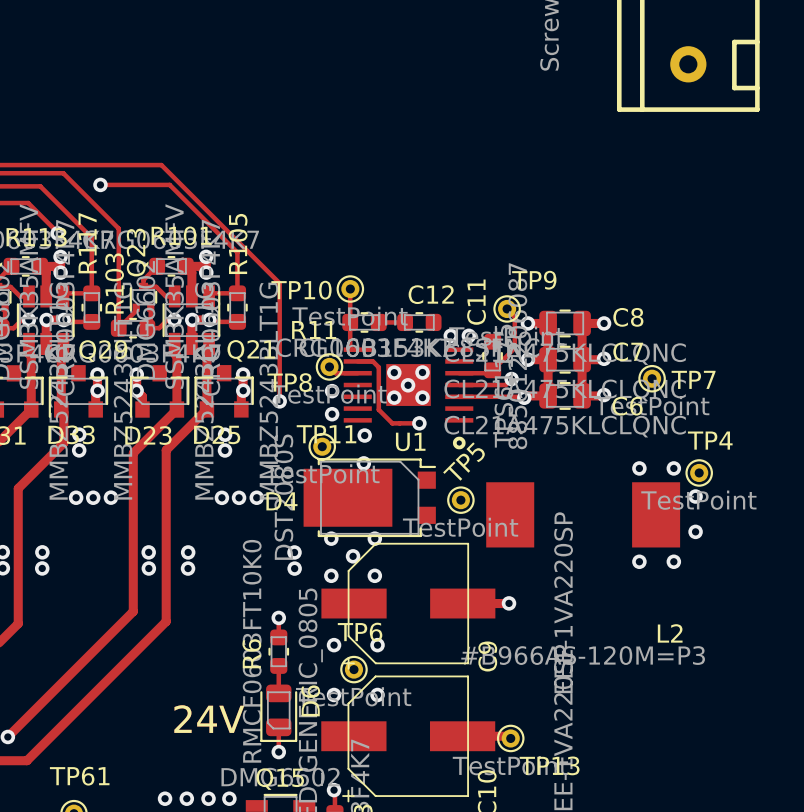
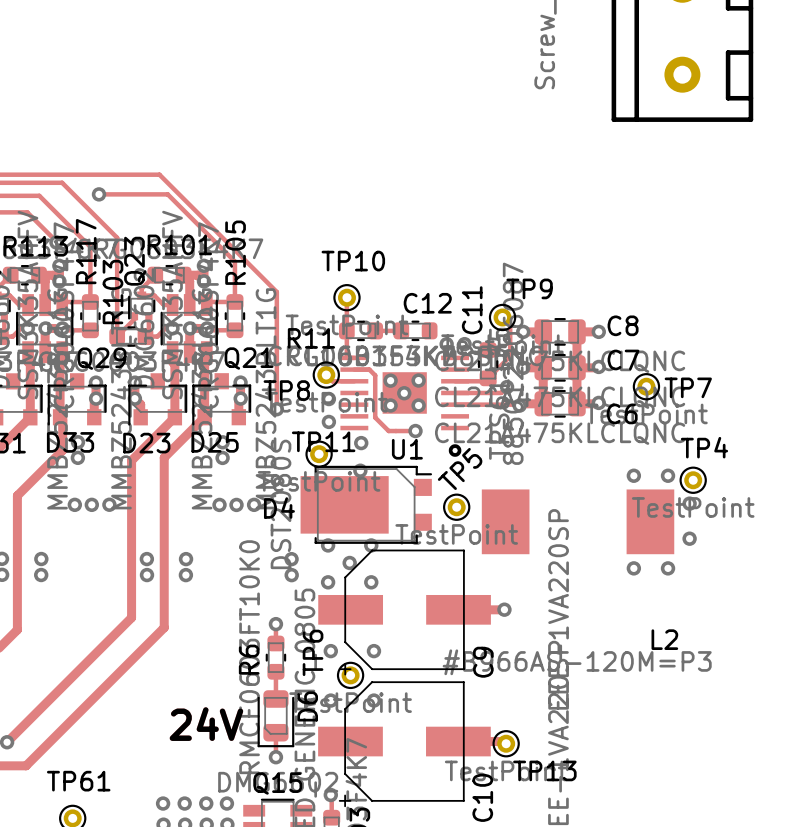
TP10 name position: TP10 (301, 290) -> TP10 (353, 261)
TP6 name rotation: 0° (360, 632) -> 90° counterclockwise (313, 652)

